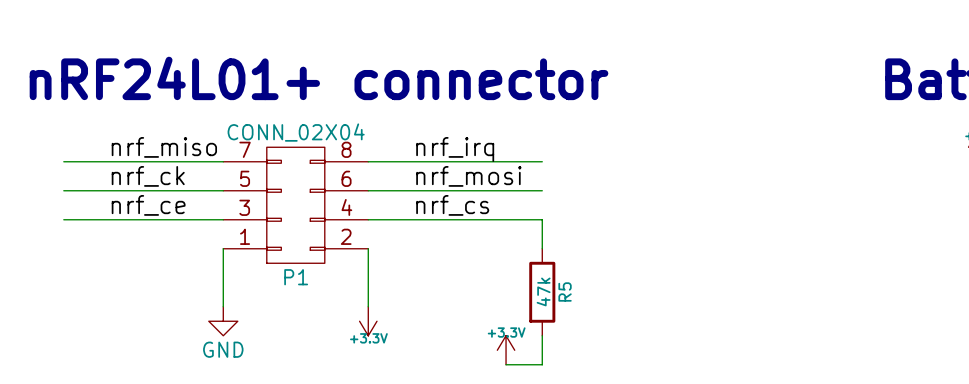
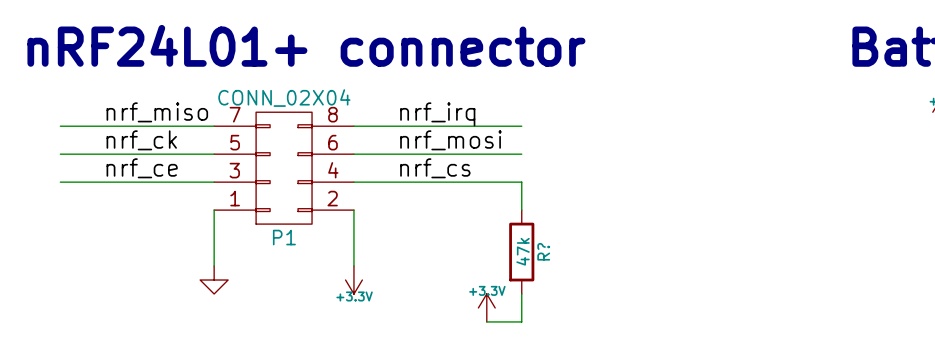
R5 name: R5 (565, 291) -> R? (543, 251)
power symbol text: GND (223, 349) -> none

